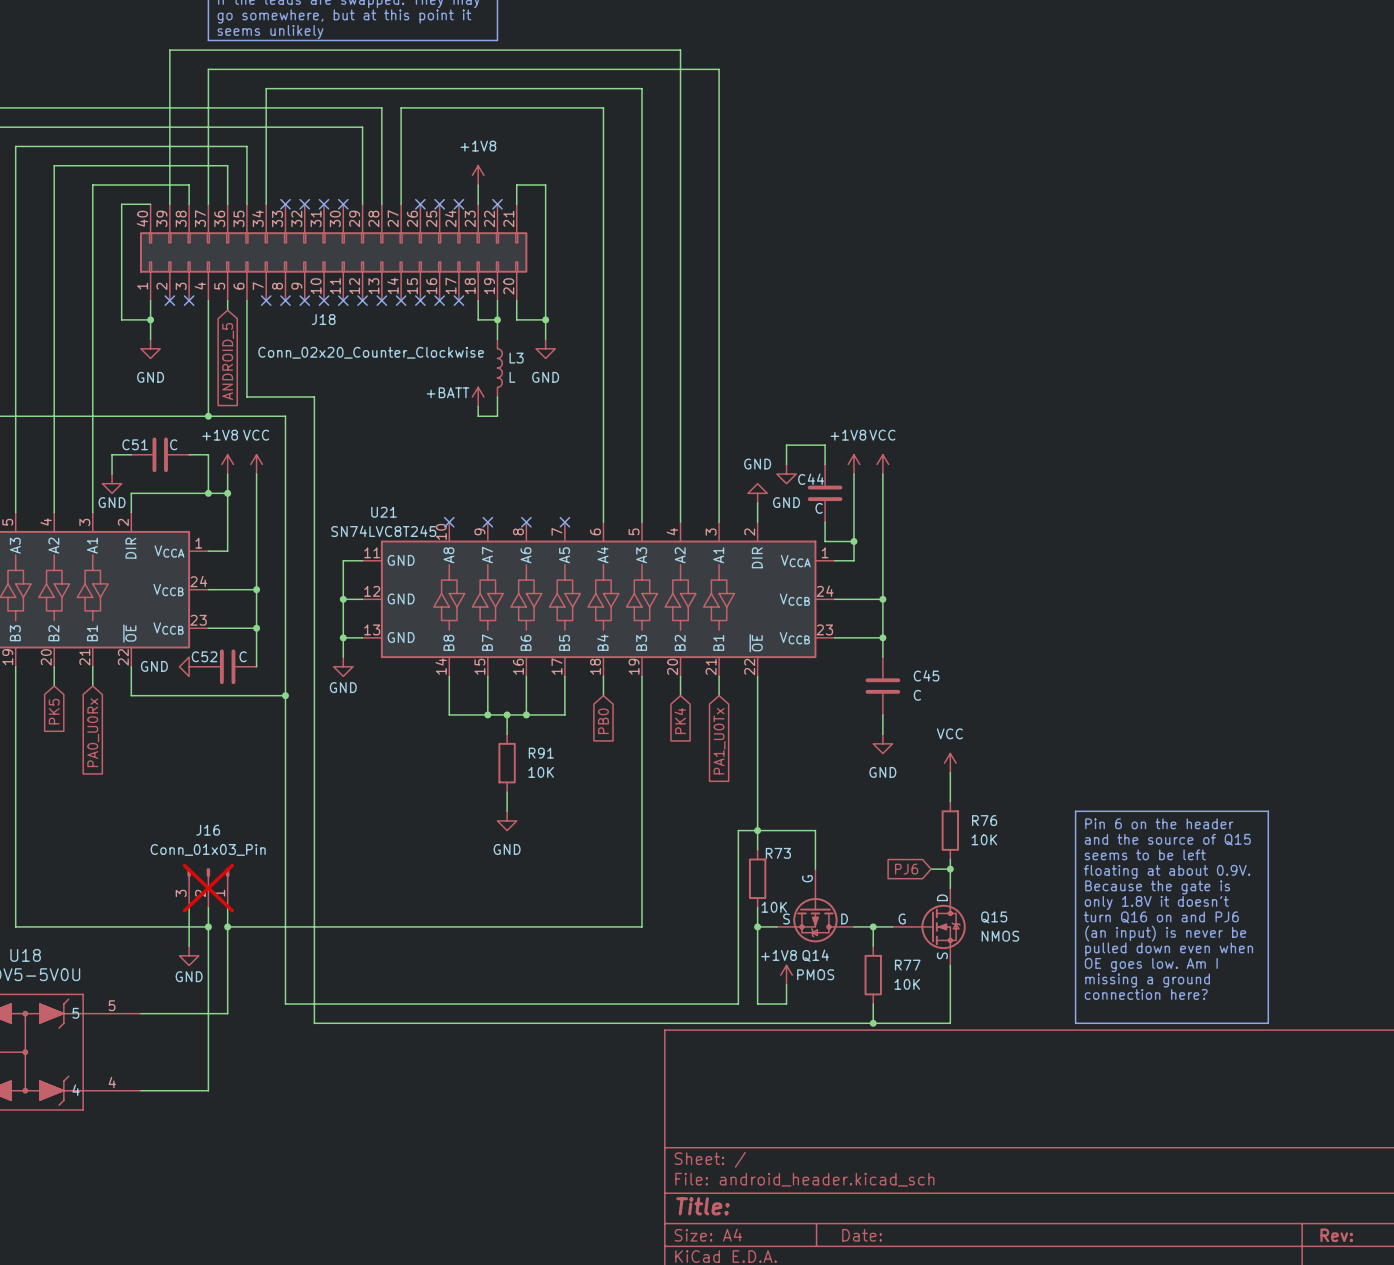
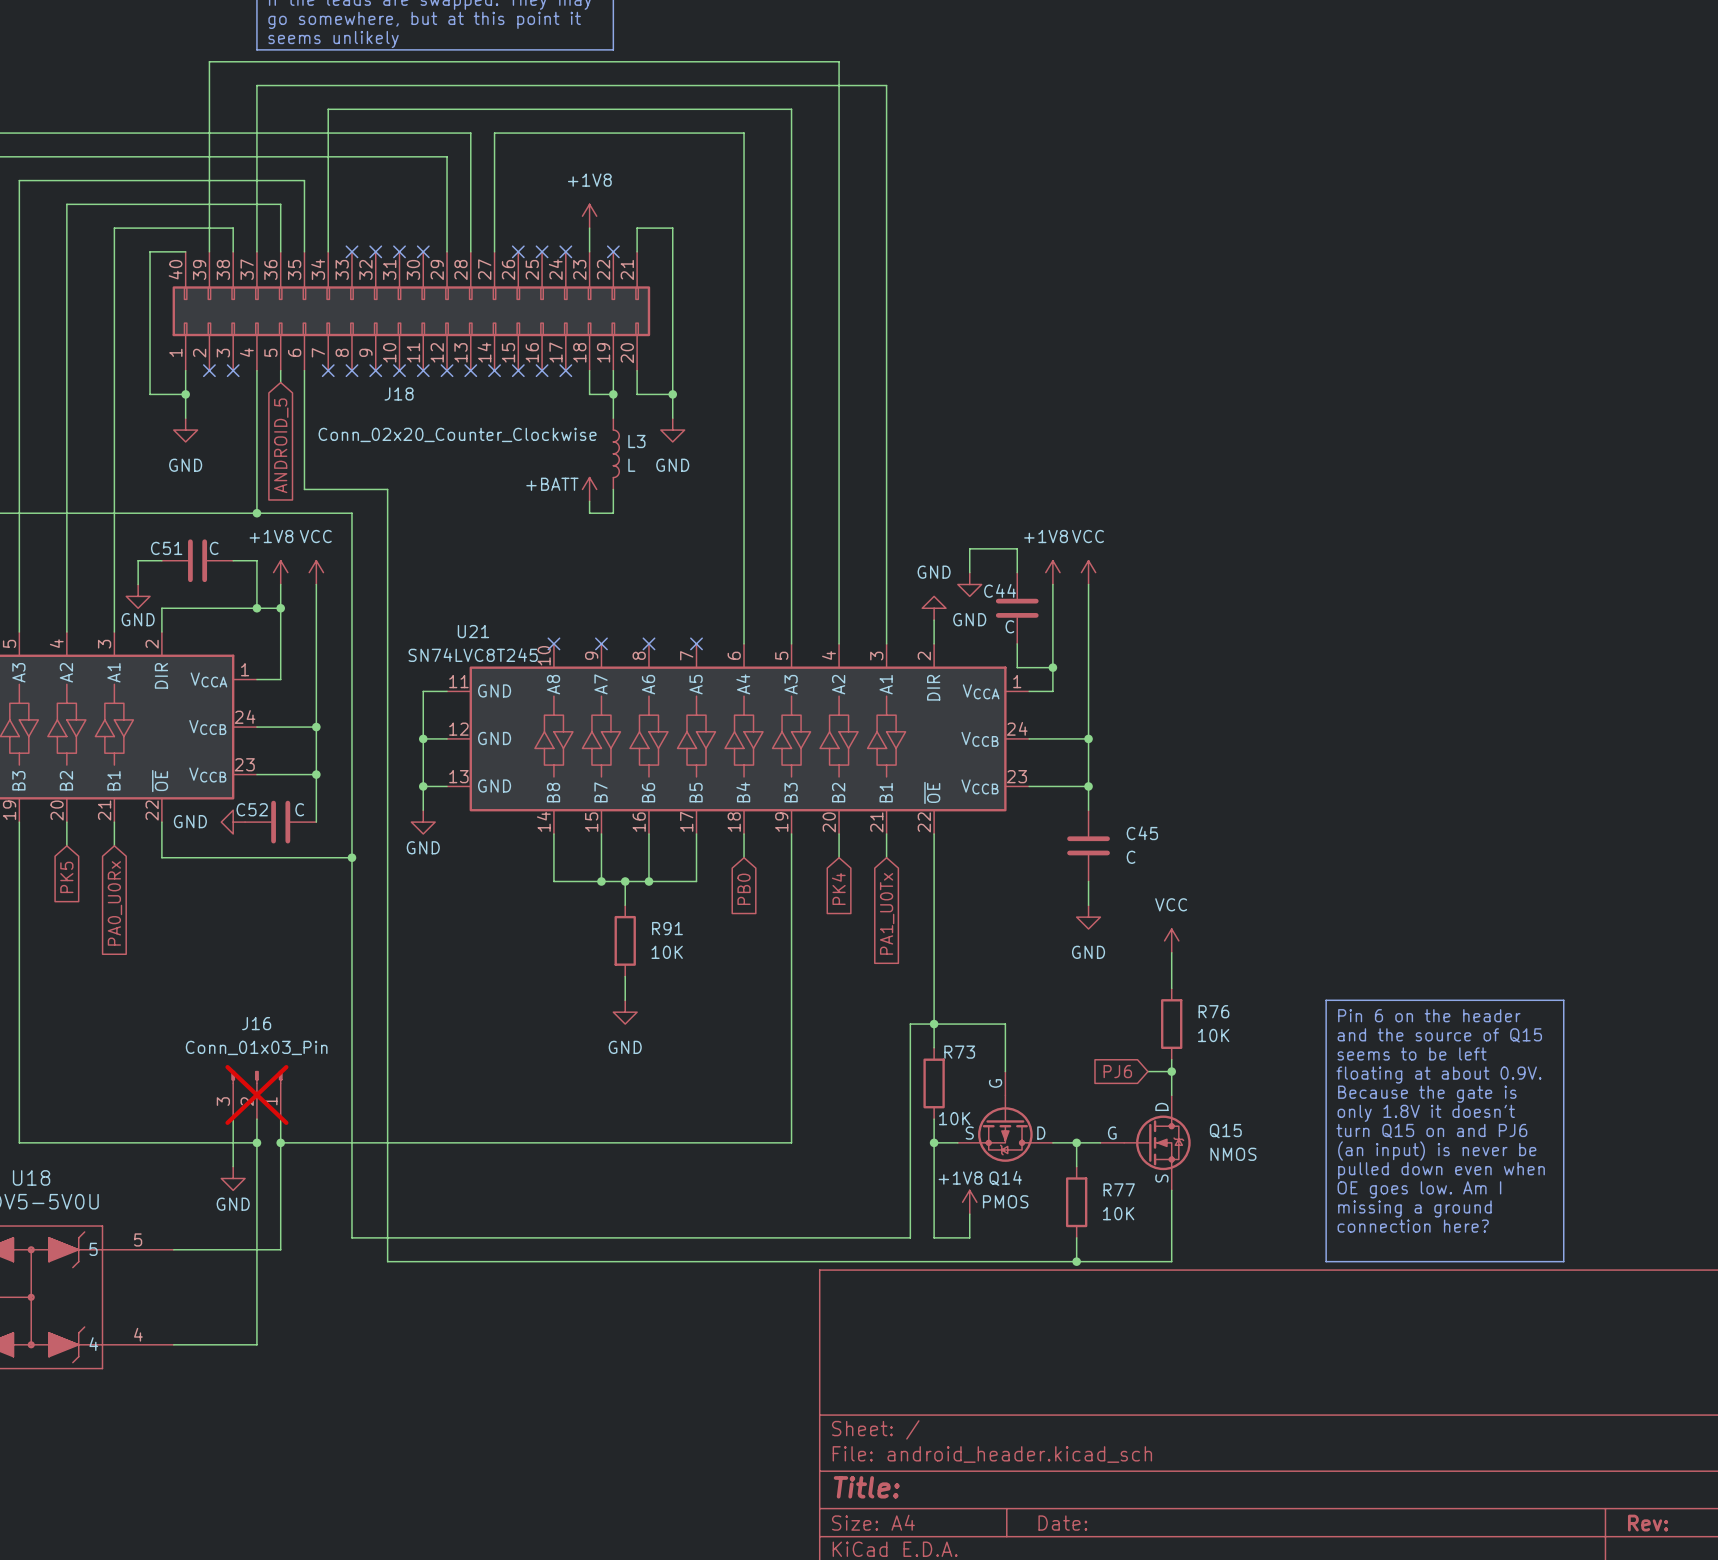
text: turn Q16 on and PJ6 (1161, 917) -> turn Q15 on and PJ6 (1431, 1131)

